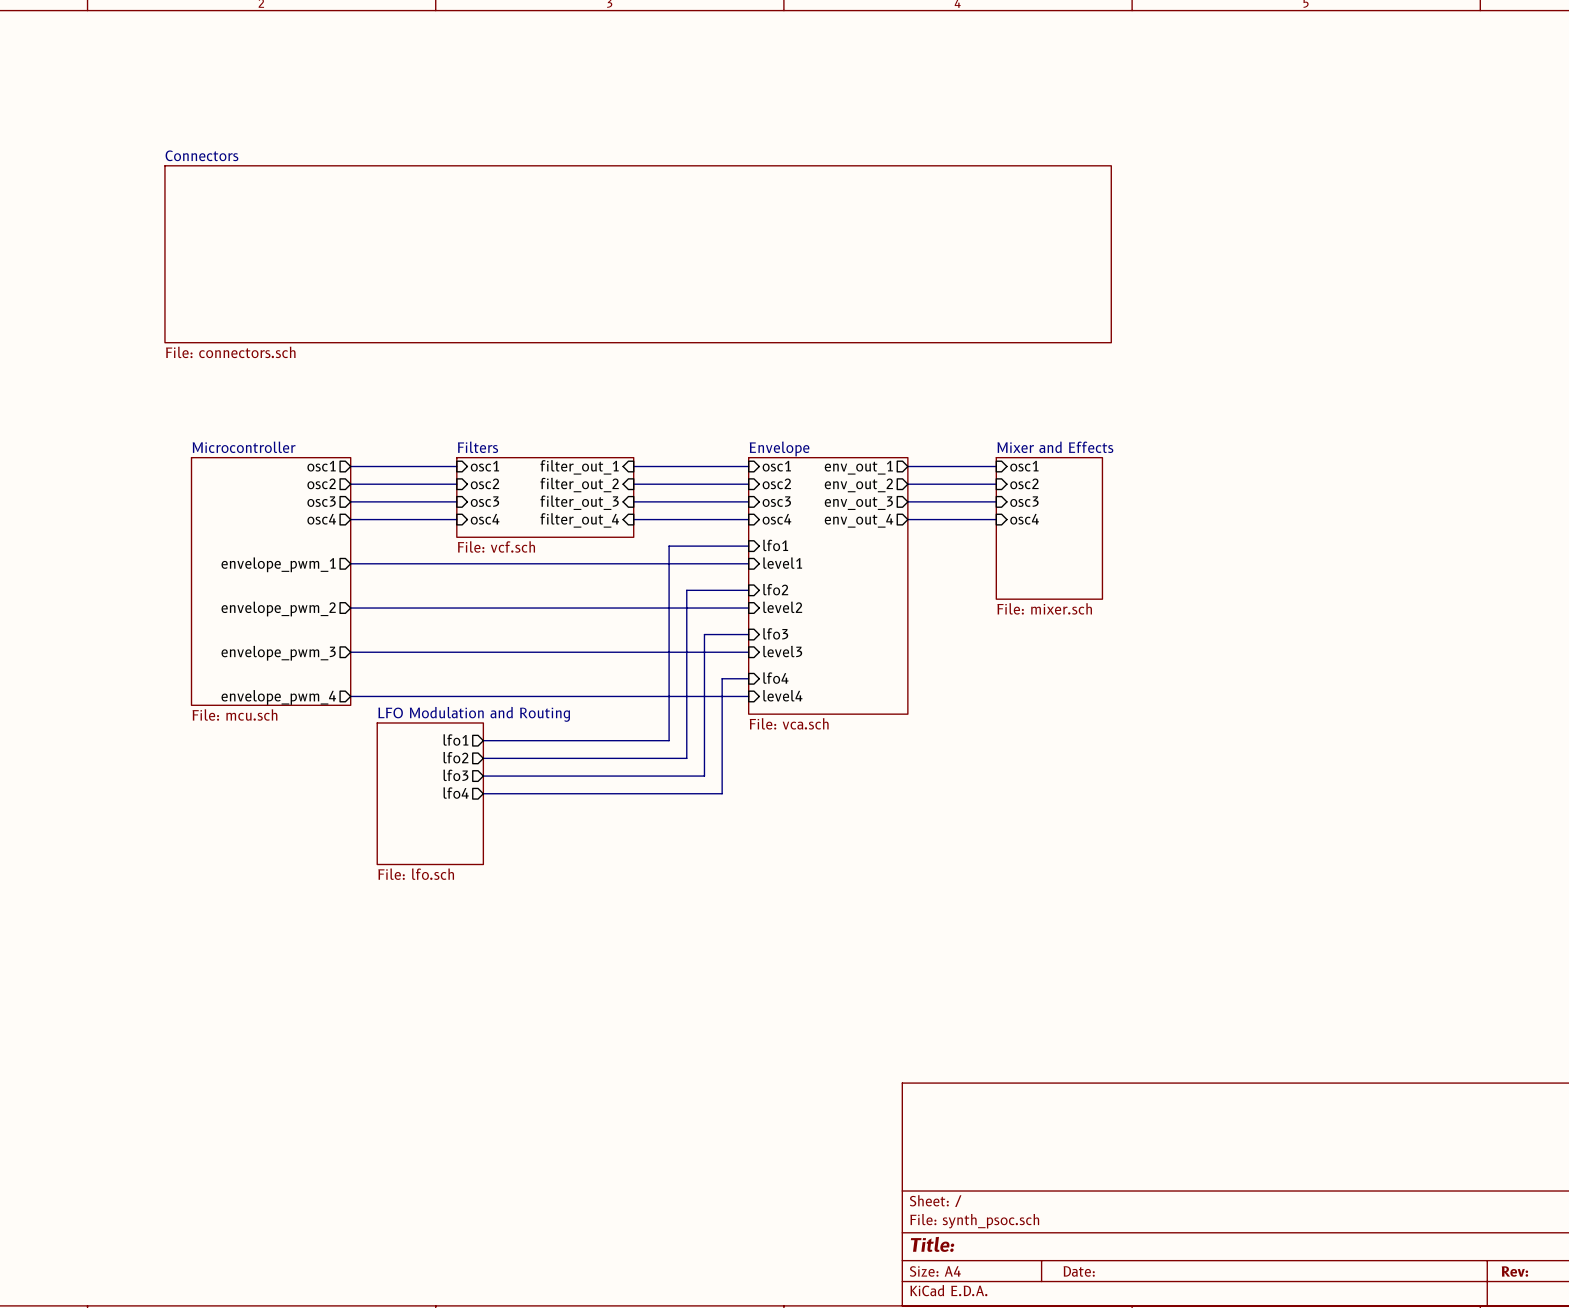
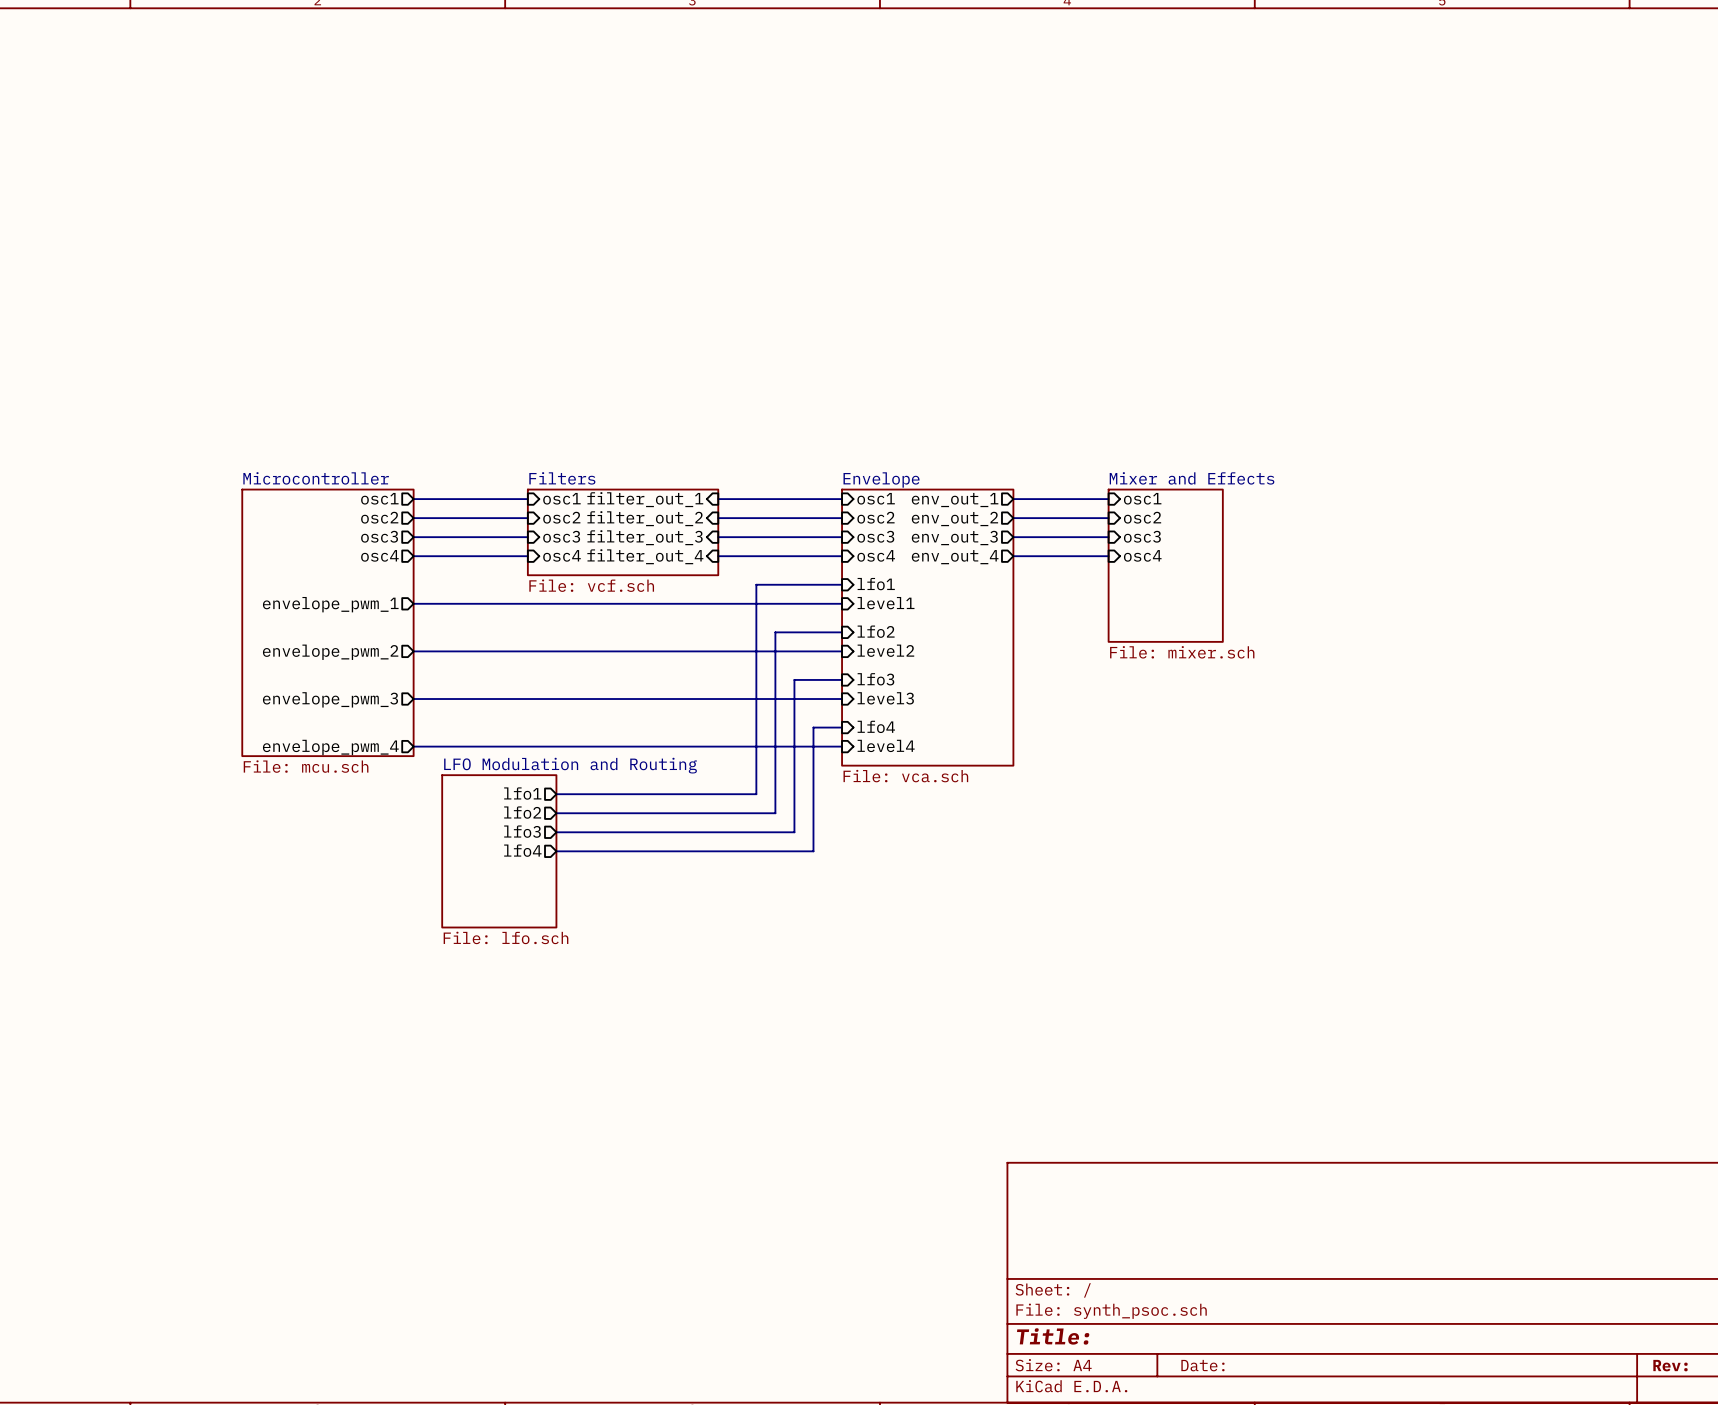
sheet Connectors: File: connectors.sch (638, 254) -> none

